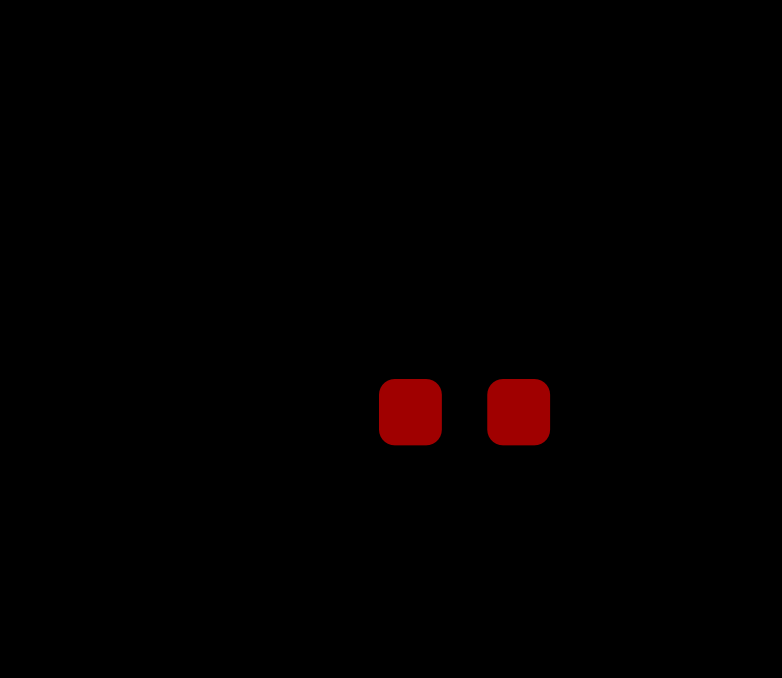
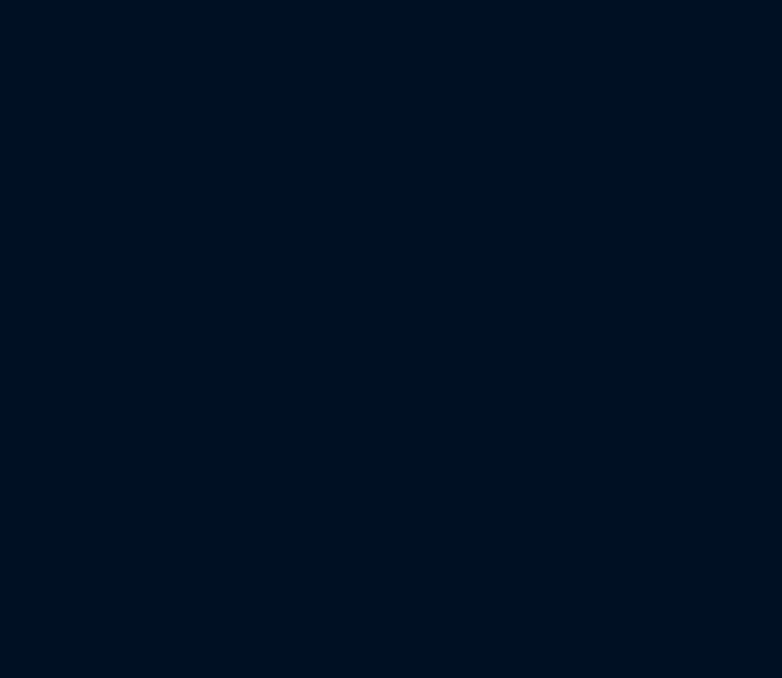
part: (464, 412) -> none

